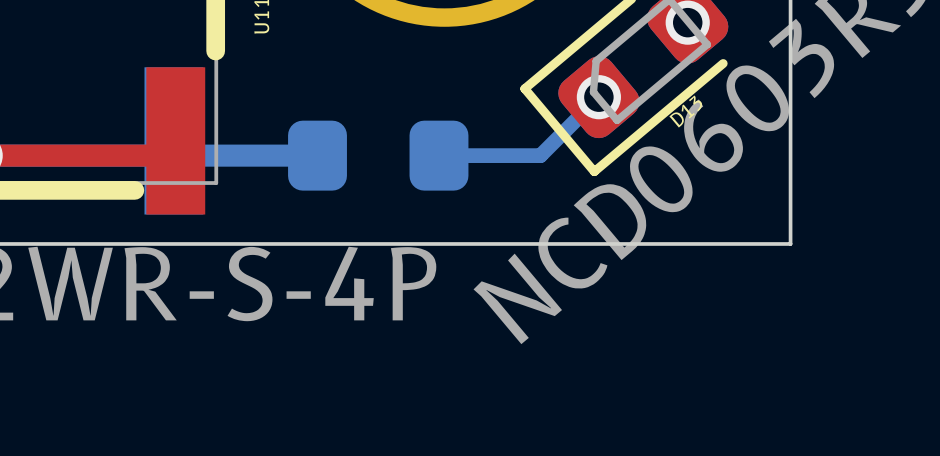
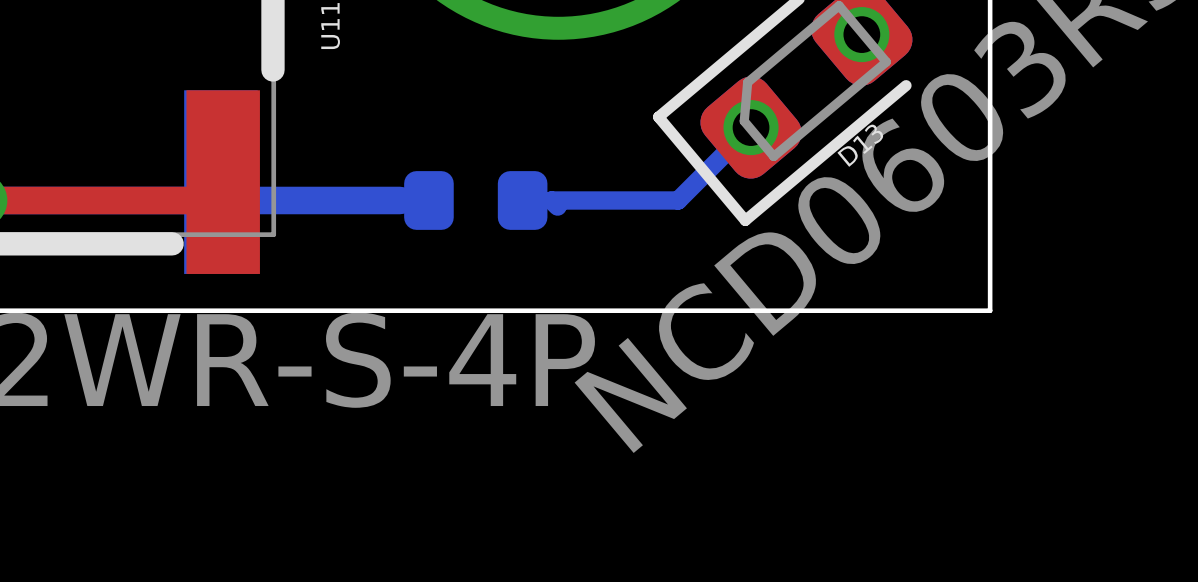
part footprint: [288, 120, 469, 191] -> [404, 171, 548, 230]

